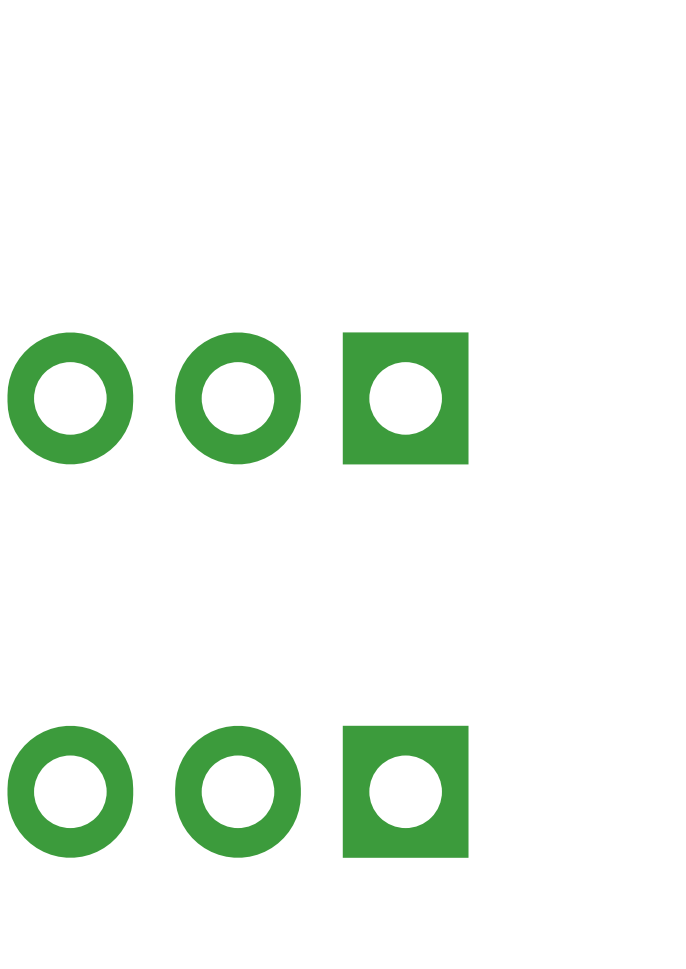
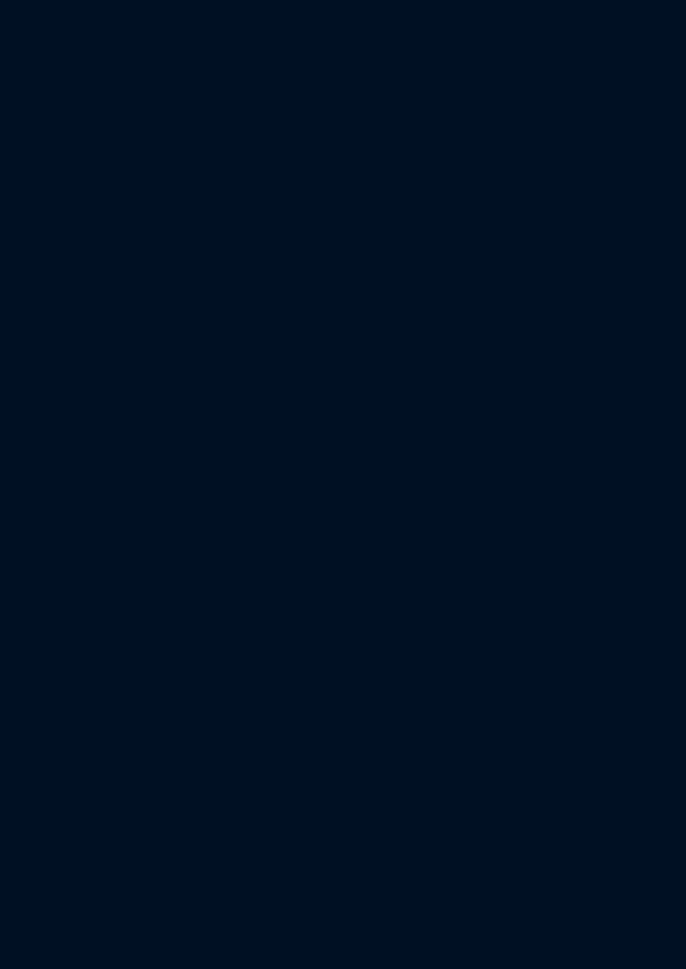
part: (237, 398) -> none
part: (237, 791) -> none

